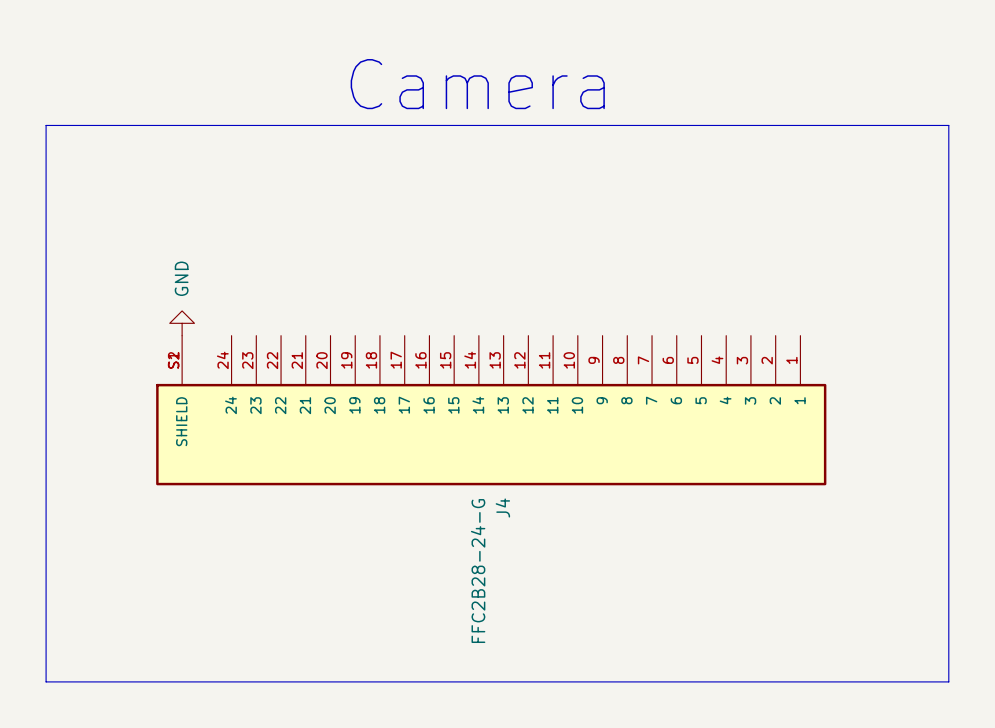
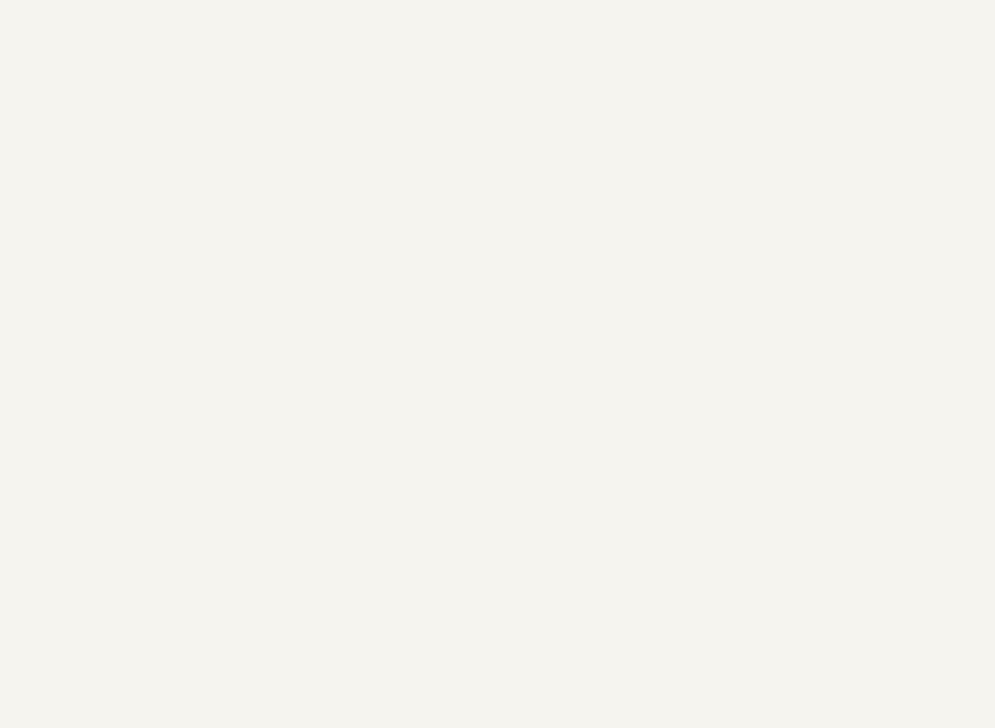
text: Camera (477, 84) -> none
line: (46, 125) (948, 125) (948, 681) (46, 681) (46, 125) -> none
power symbol: GND (182, 323) -> none
J4: FFC2B28-24-G (491, 410) -> none

